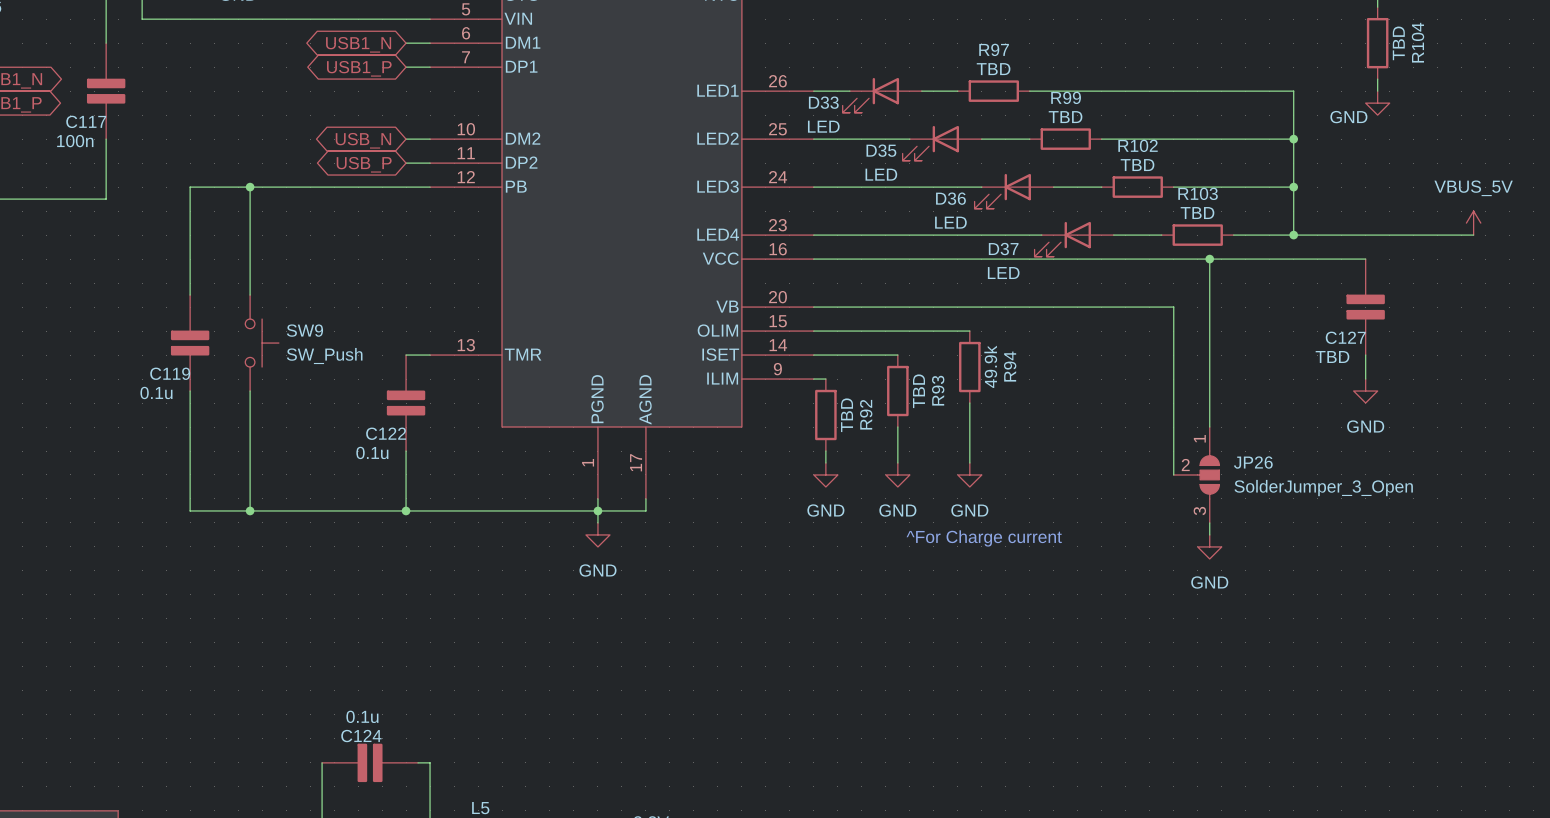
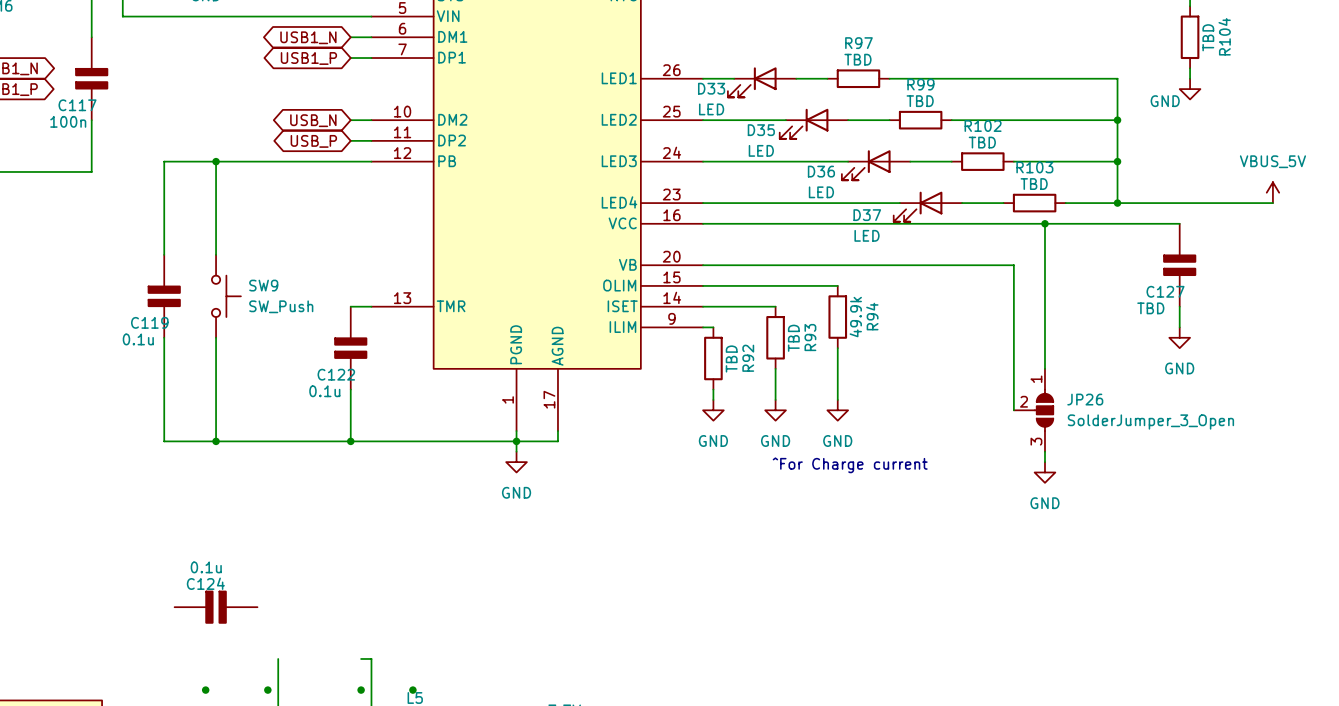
C124 position: (370, 762) -> (216, 607)
junction: none -> (205, 690)
junction: none -> (267, 690)
junction: none -> (361, 690)
junction: none -> (412, 690)

